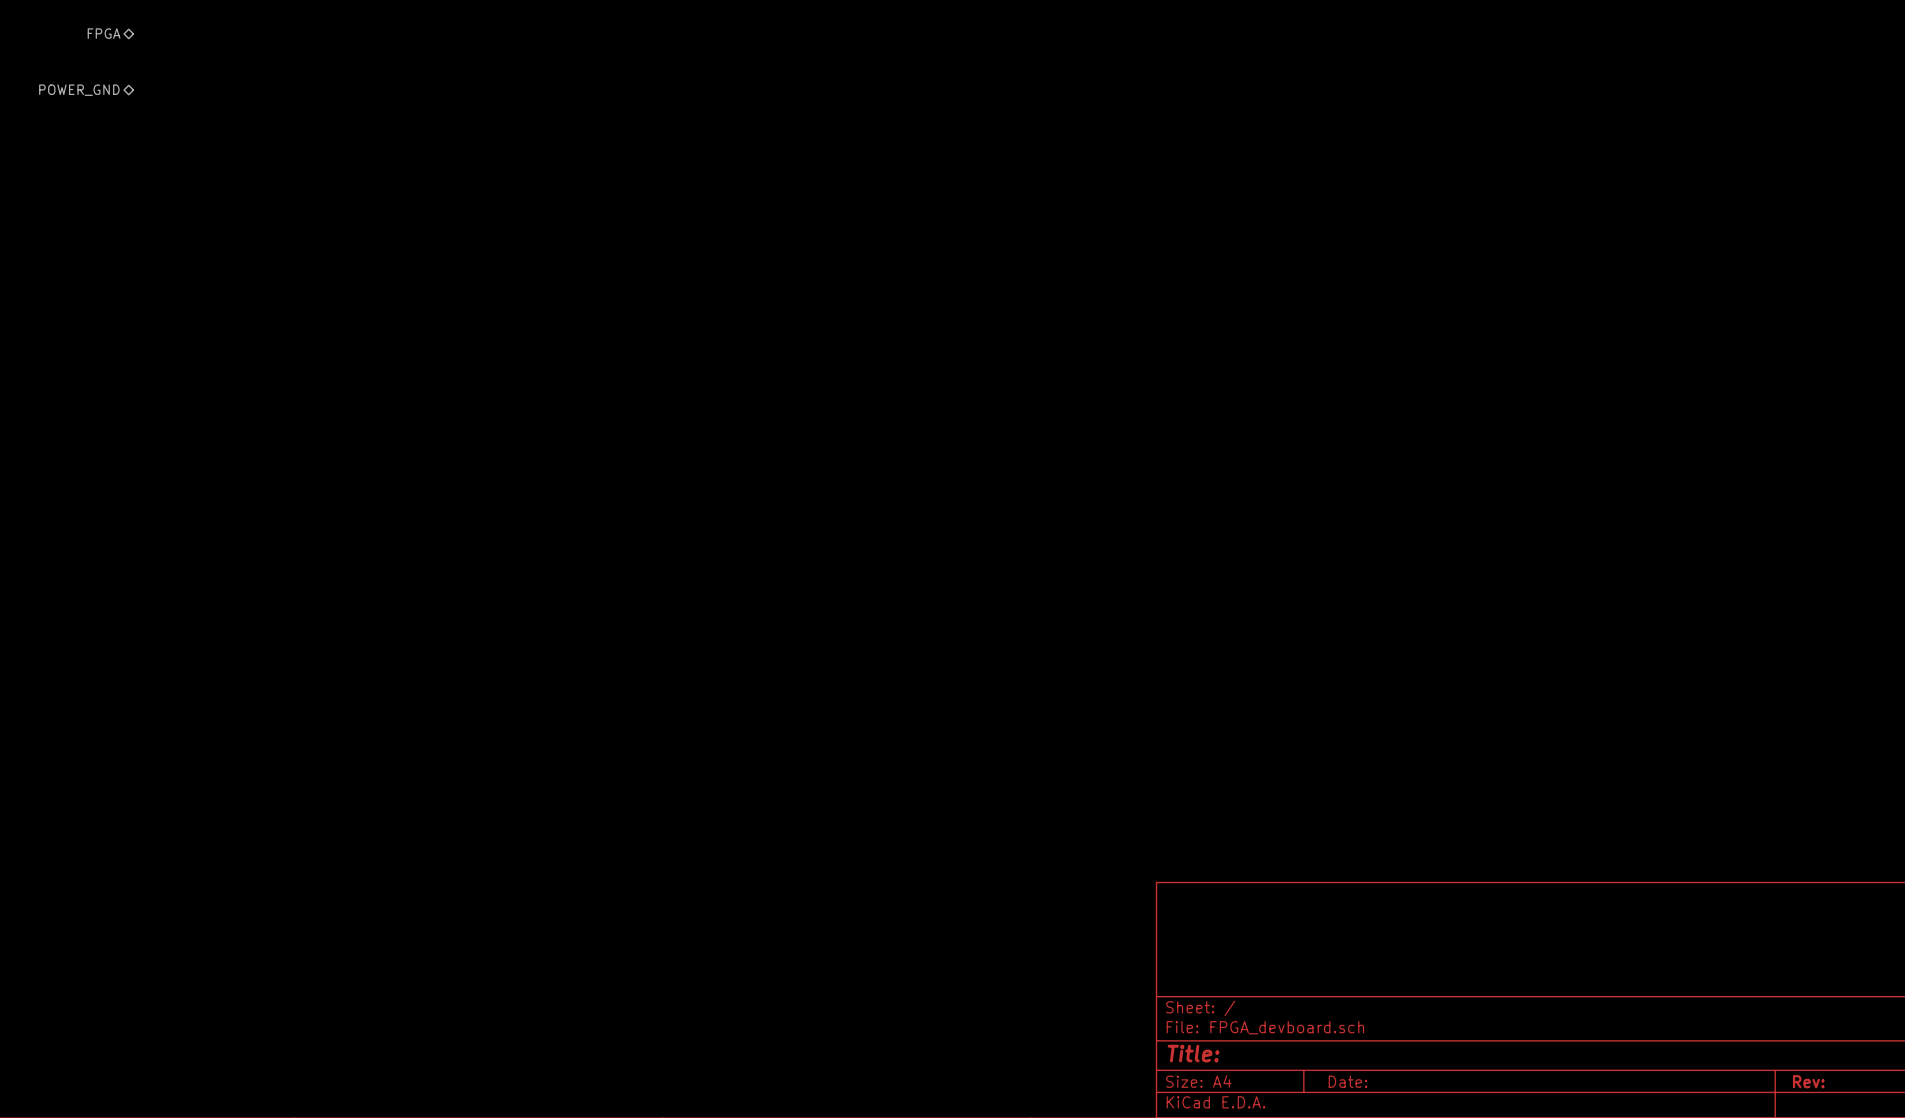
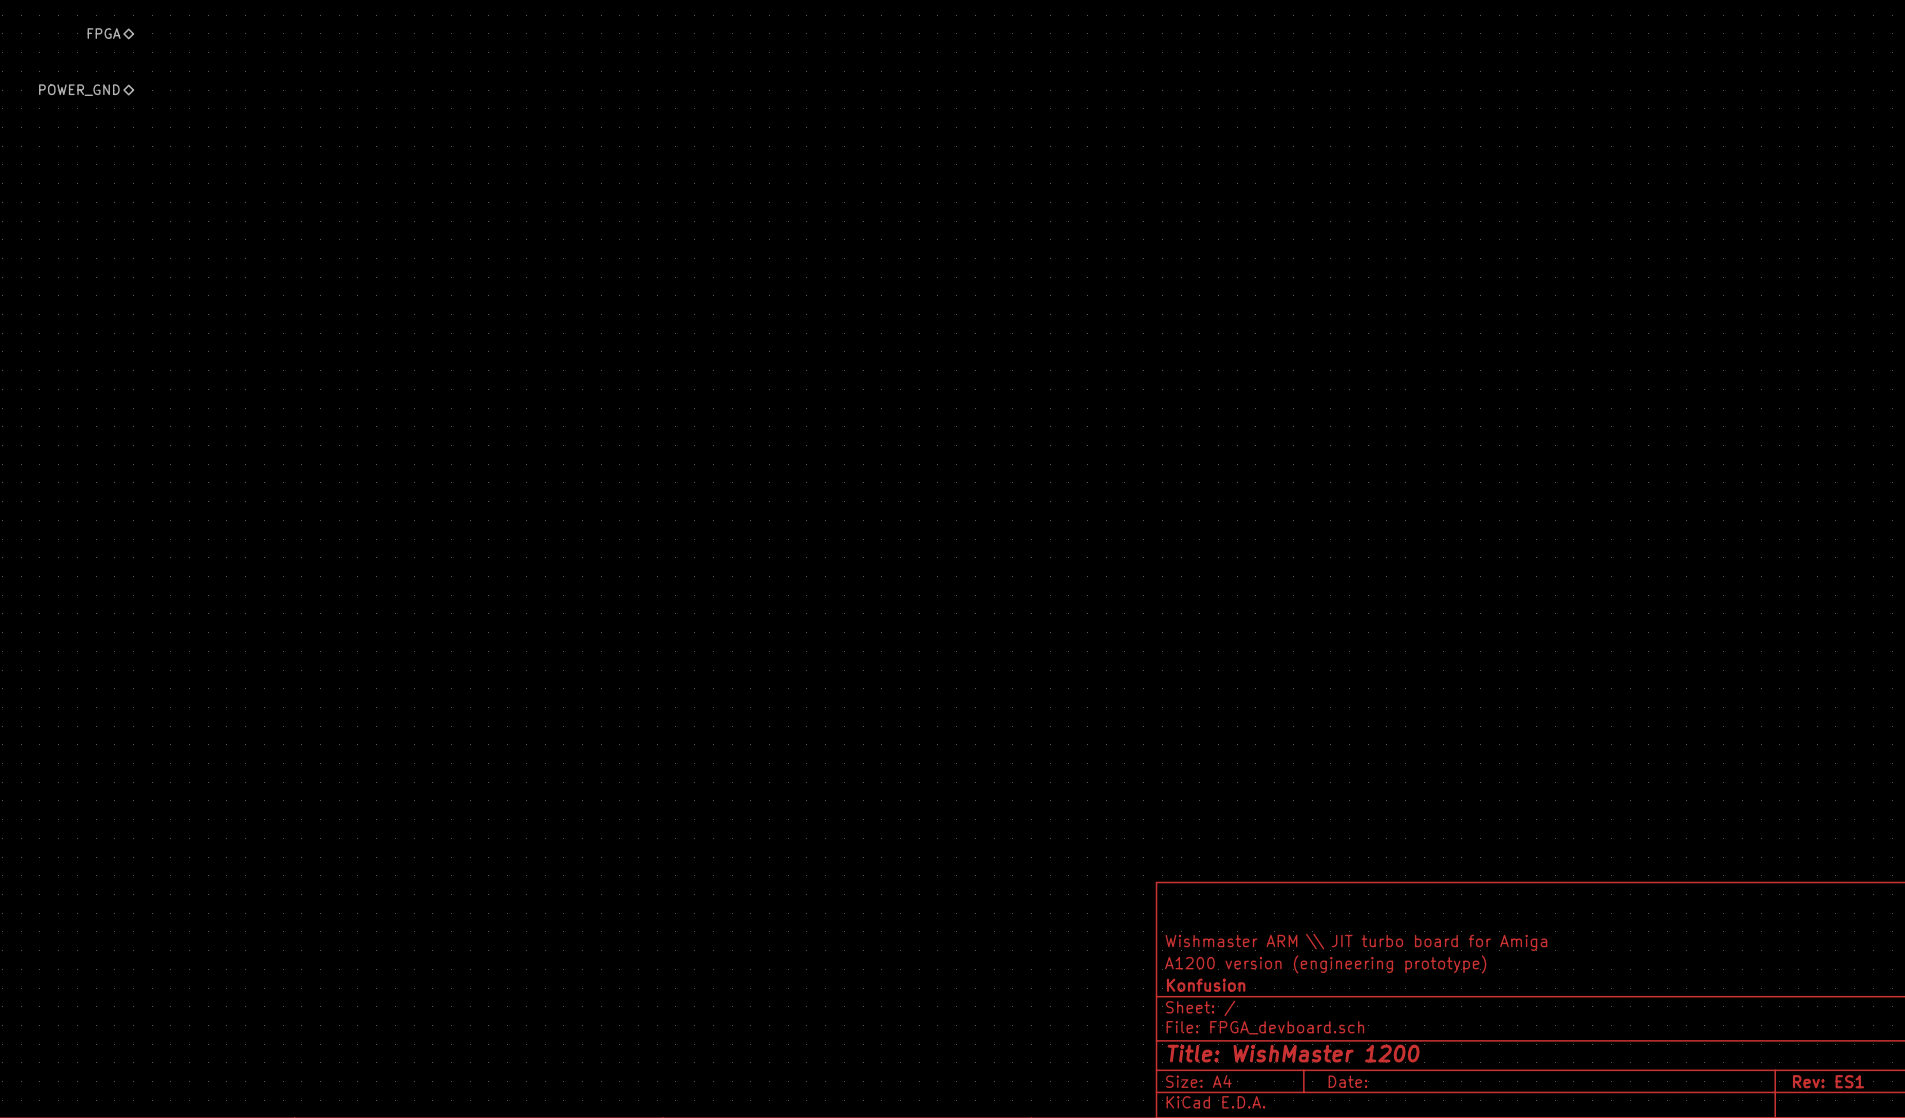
title block: none -> Wishmaster ARM \\ JIT turbo board for Amiga (1356, 942)
title block: none -> A1200 version (engineering prototype) (1325, 964)
title block: none -> Konfusion (1206, 985)
title block: Title: (1193, 1053) -> Title: WishMaster 1200 (1293, 1053)
title block: Rev: (1808, 1081) -> Rev: ES1 (1828, 1081)

